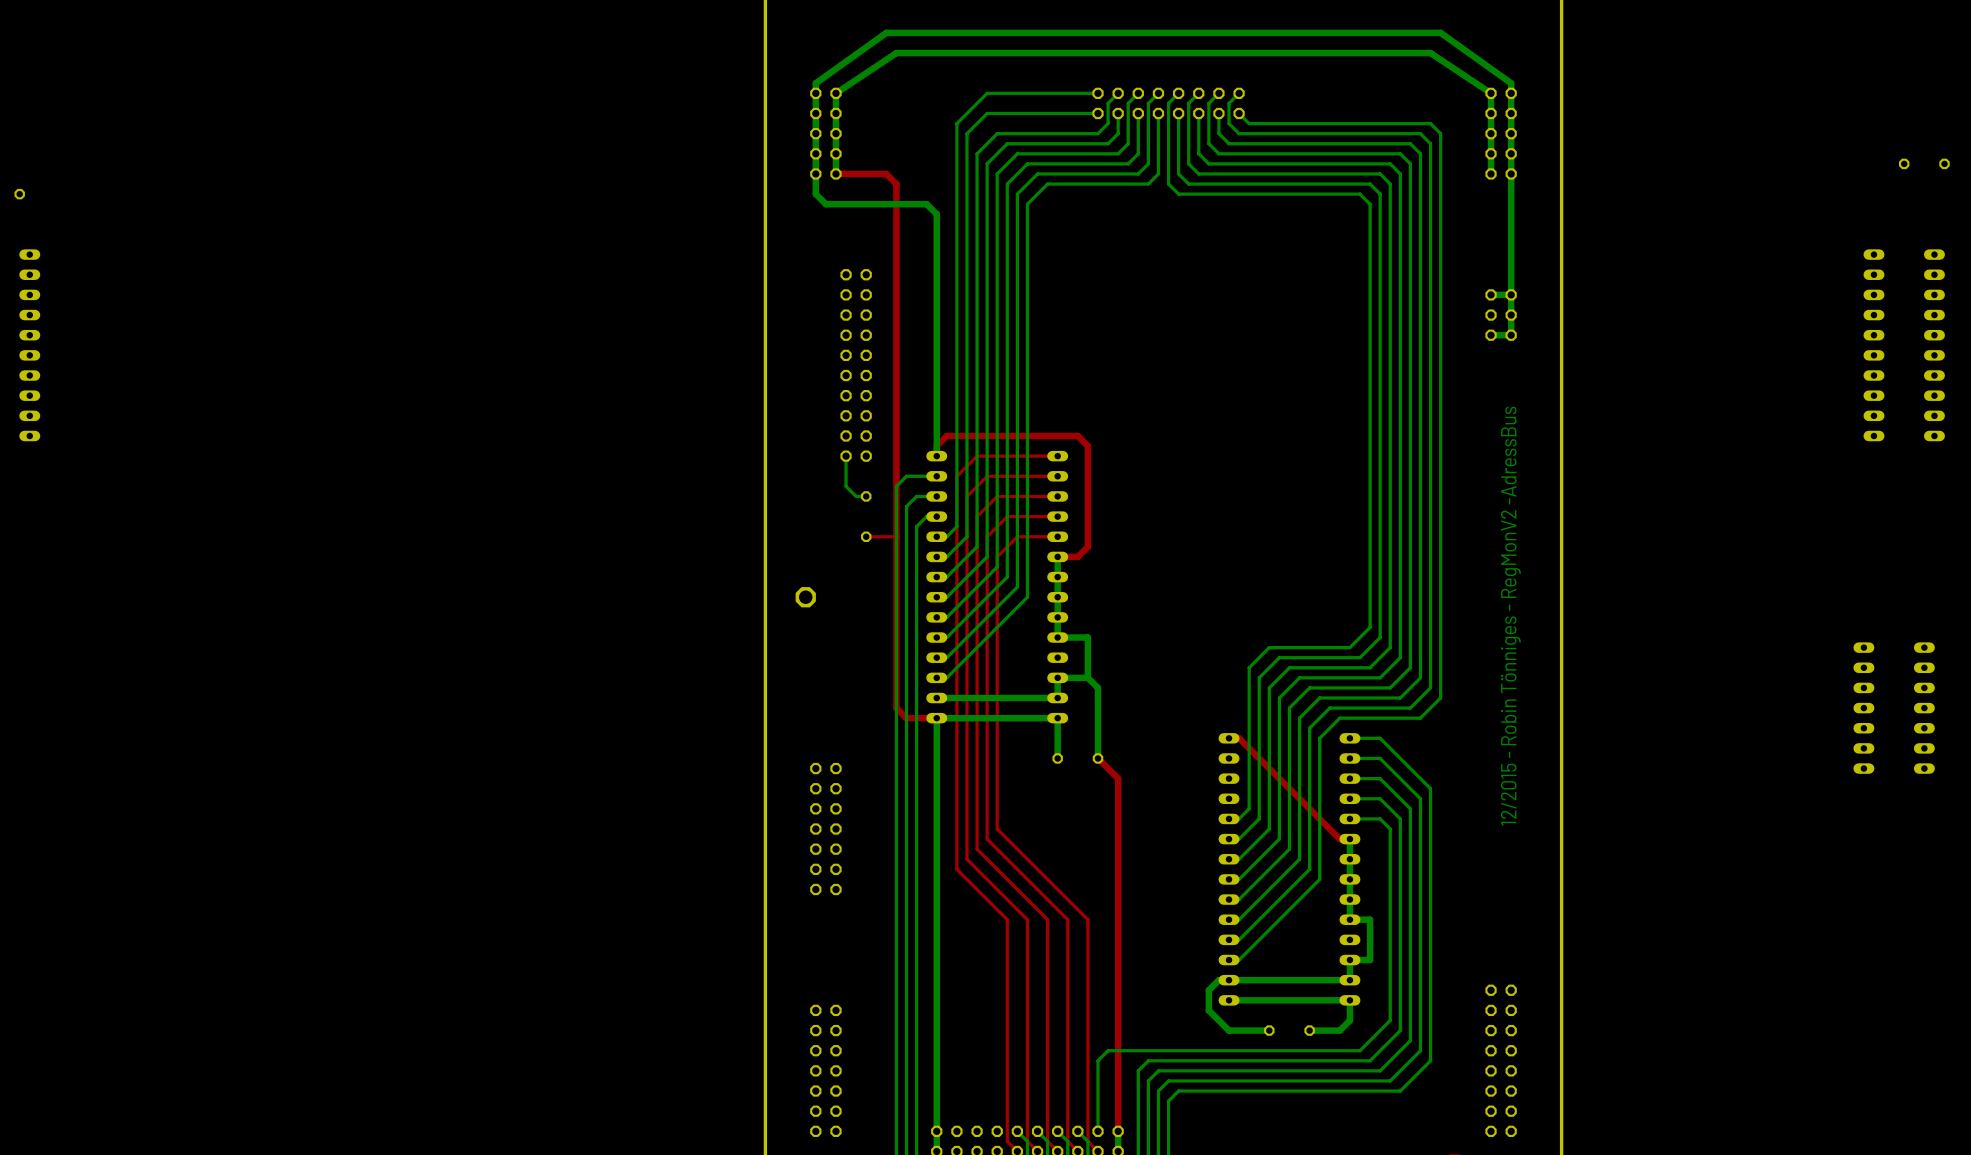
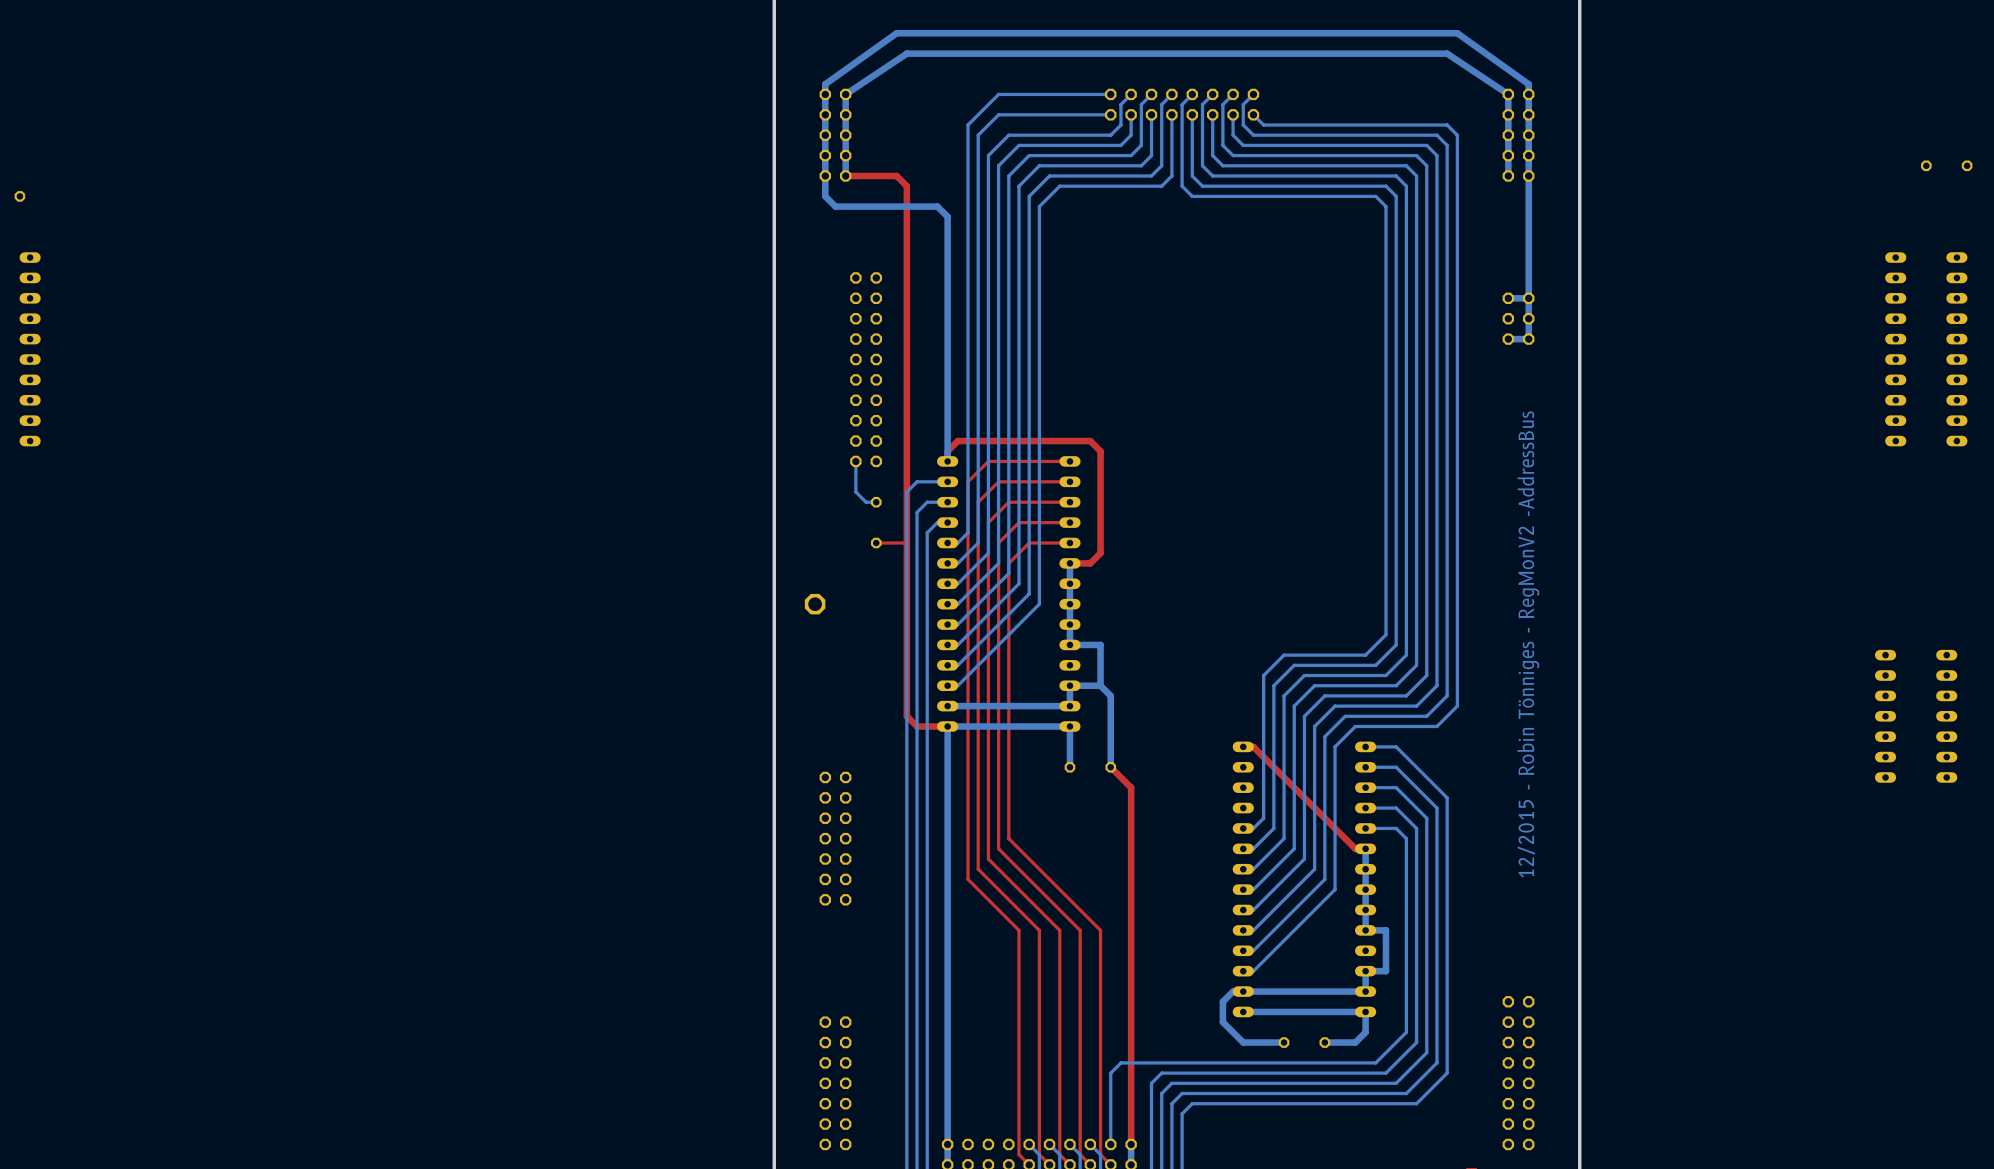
text: 12/2015 - Robin Tönniges - RegMonV2 -AdressBus (1510, 616) -> 12/2015 - Robin Tönniges - RegMonV2 -AddressBus (1528, 644)

